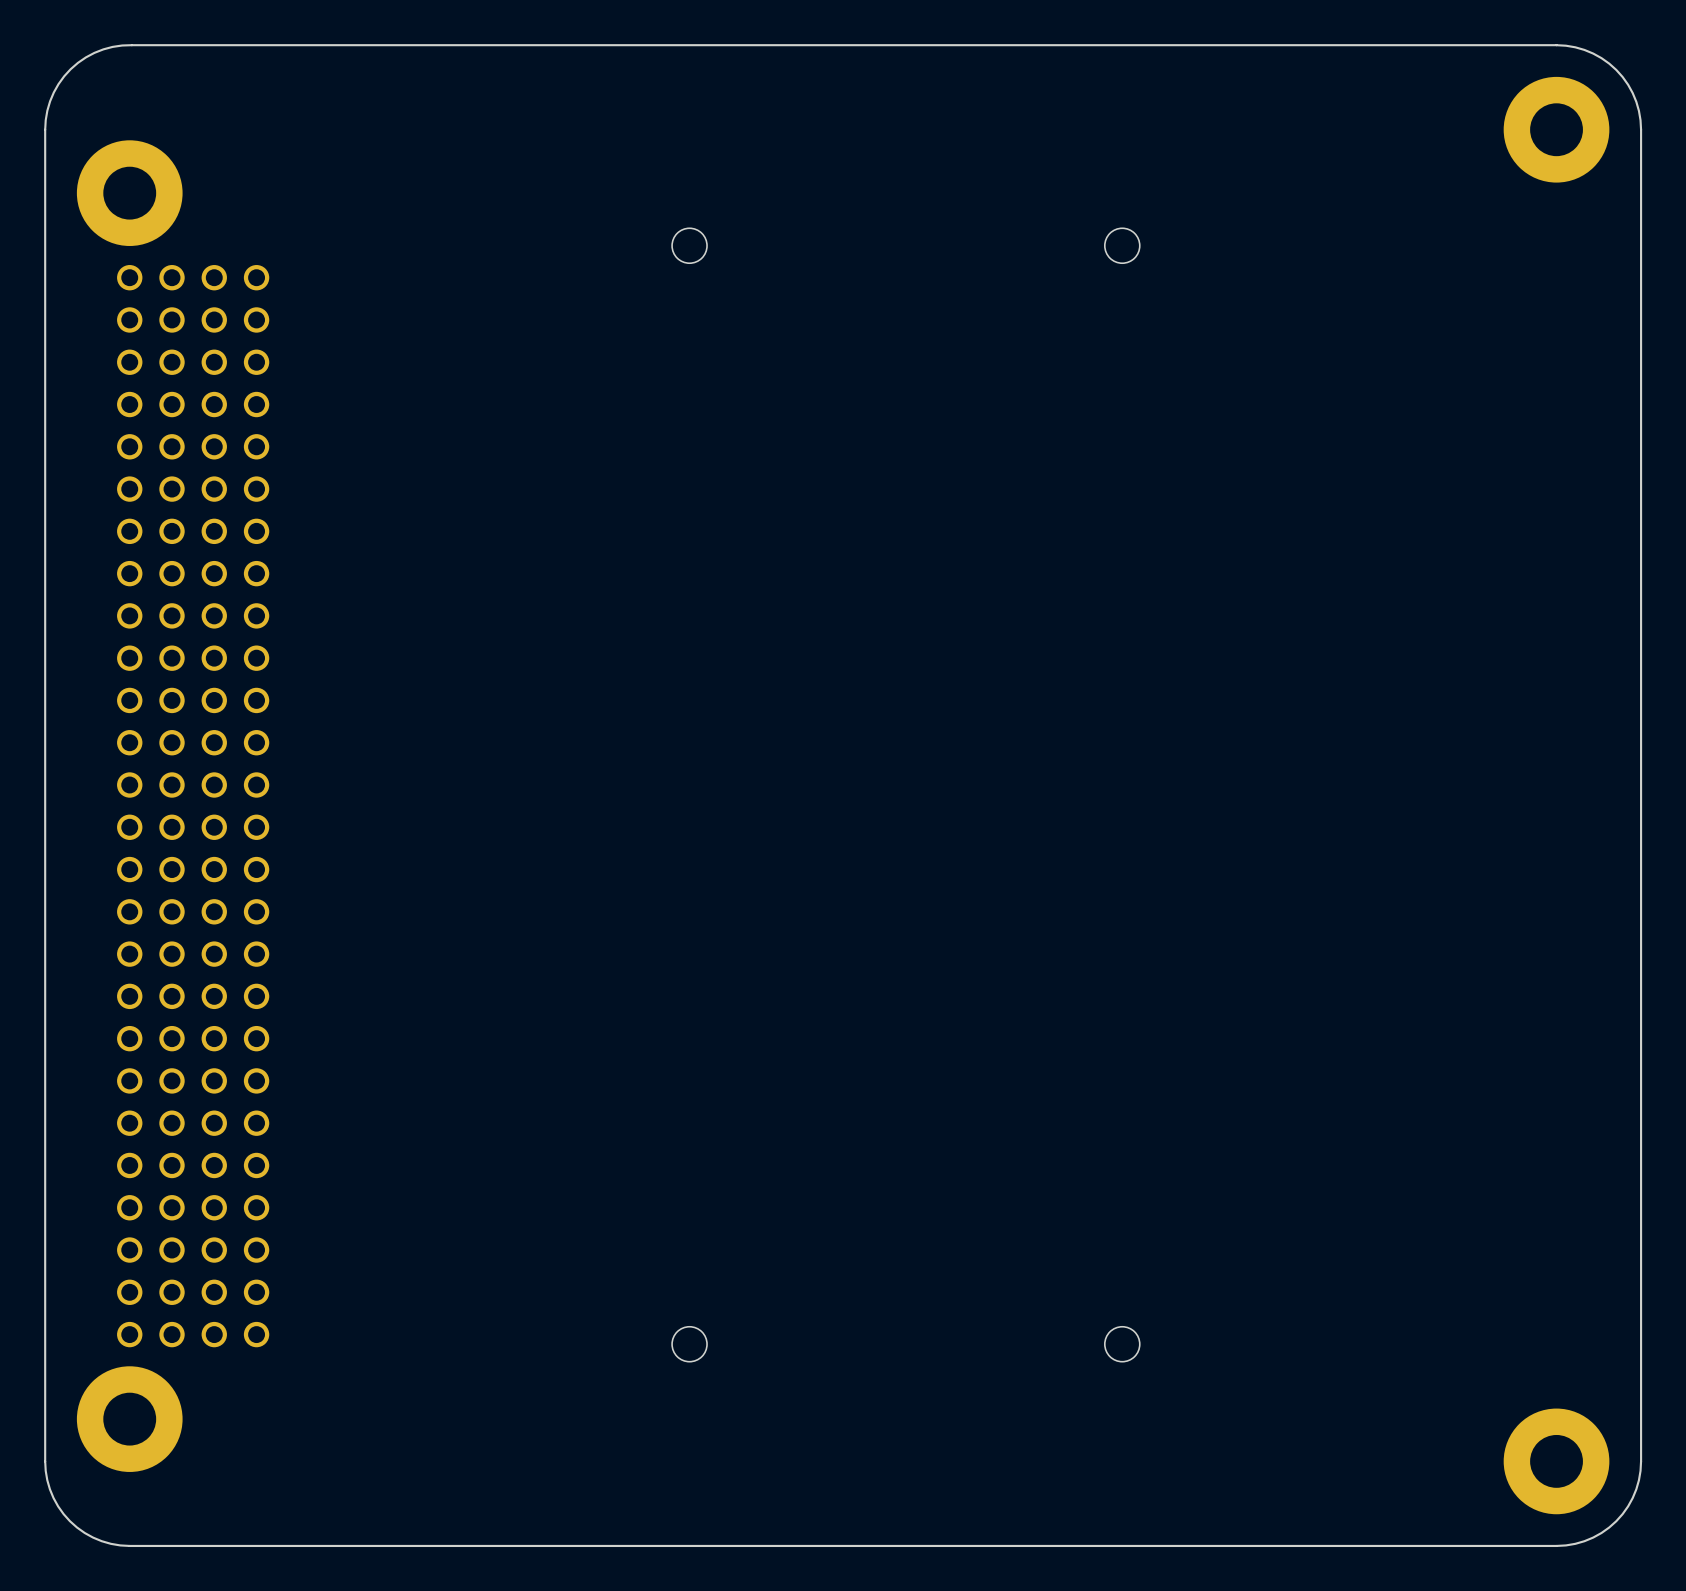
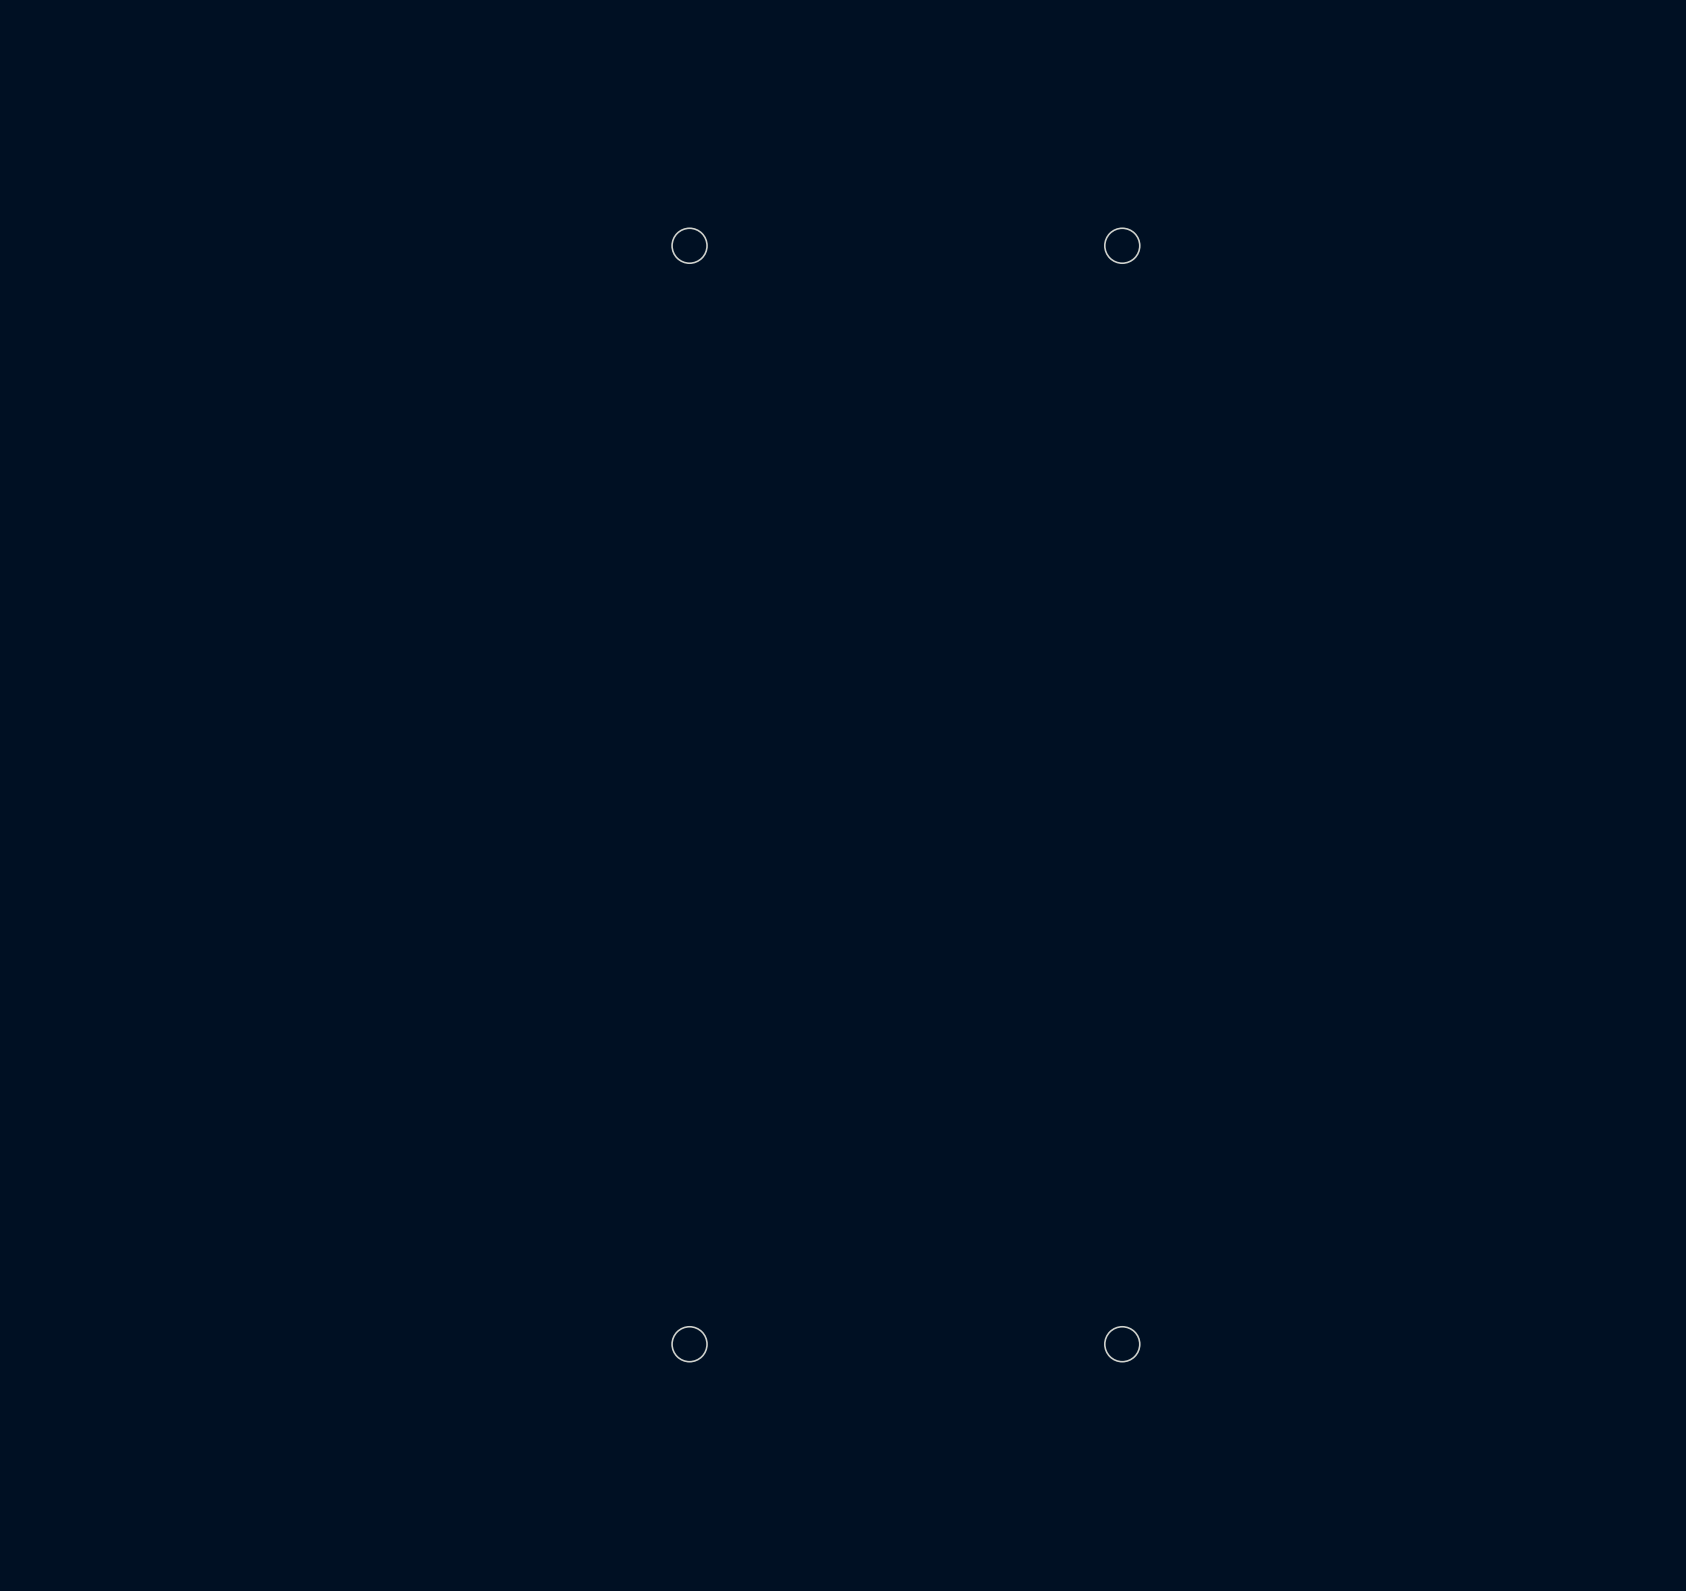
part: (843, 795) -> none

